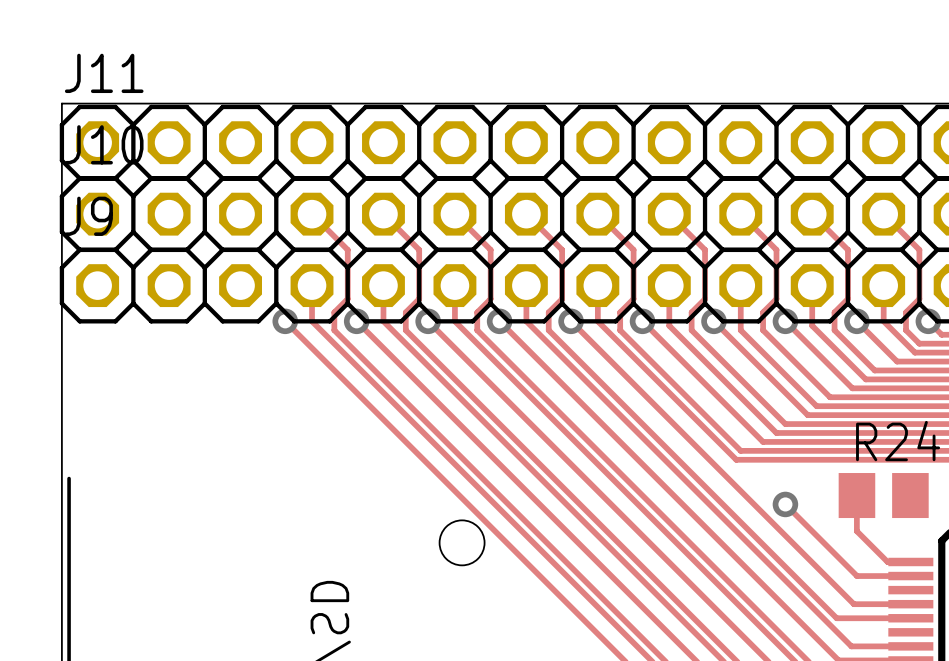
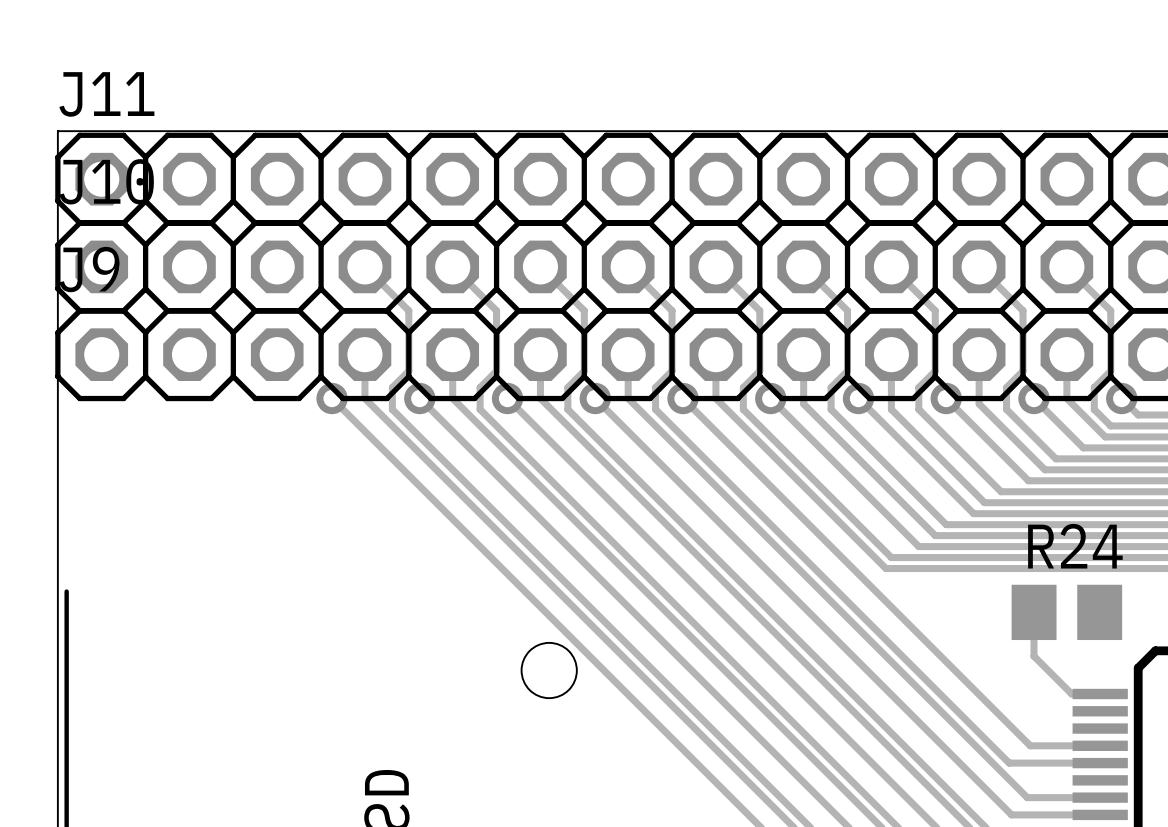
track: (785, 504) (857, 576) (910, 576) -> none
via: (785, 504) -> none

